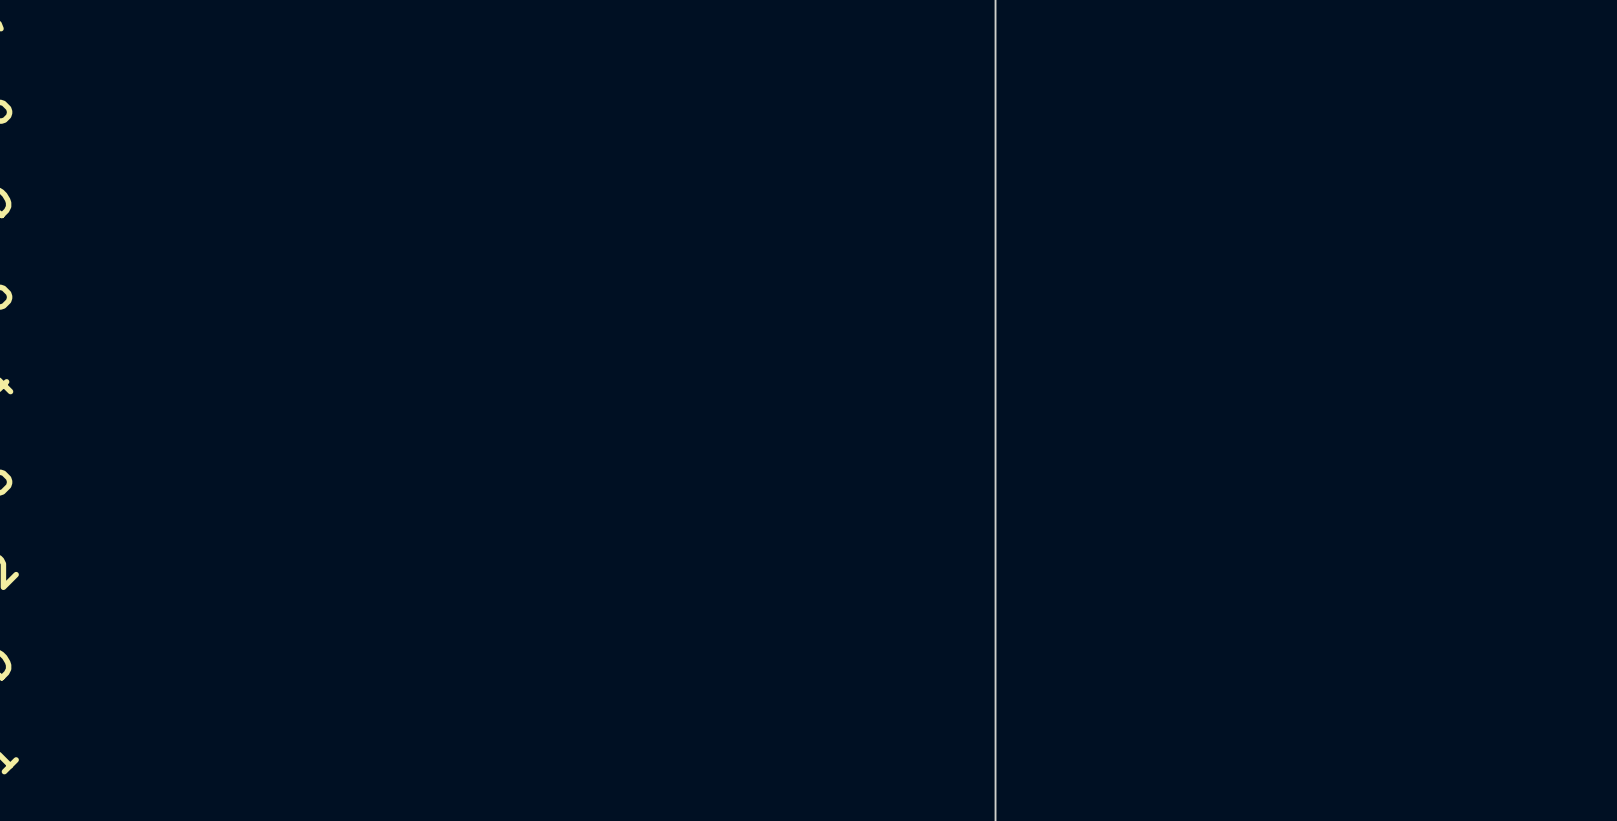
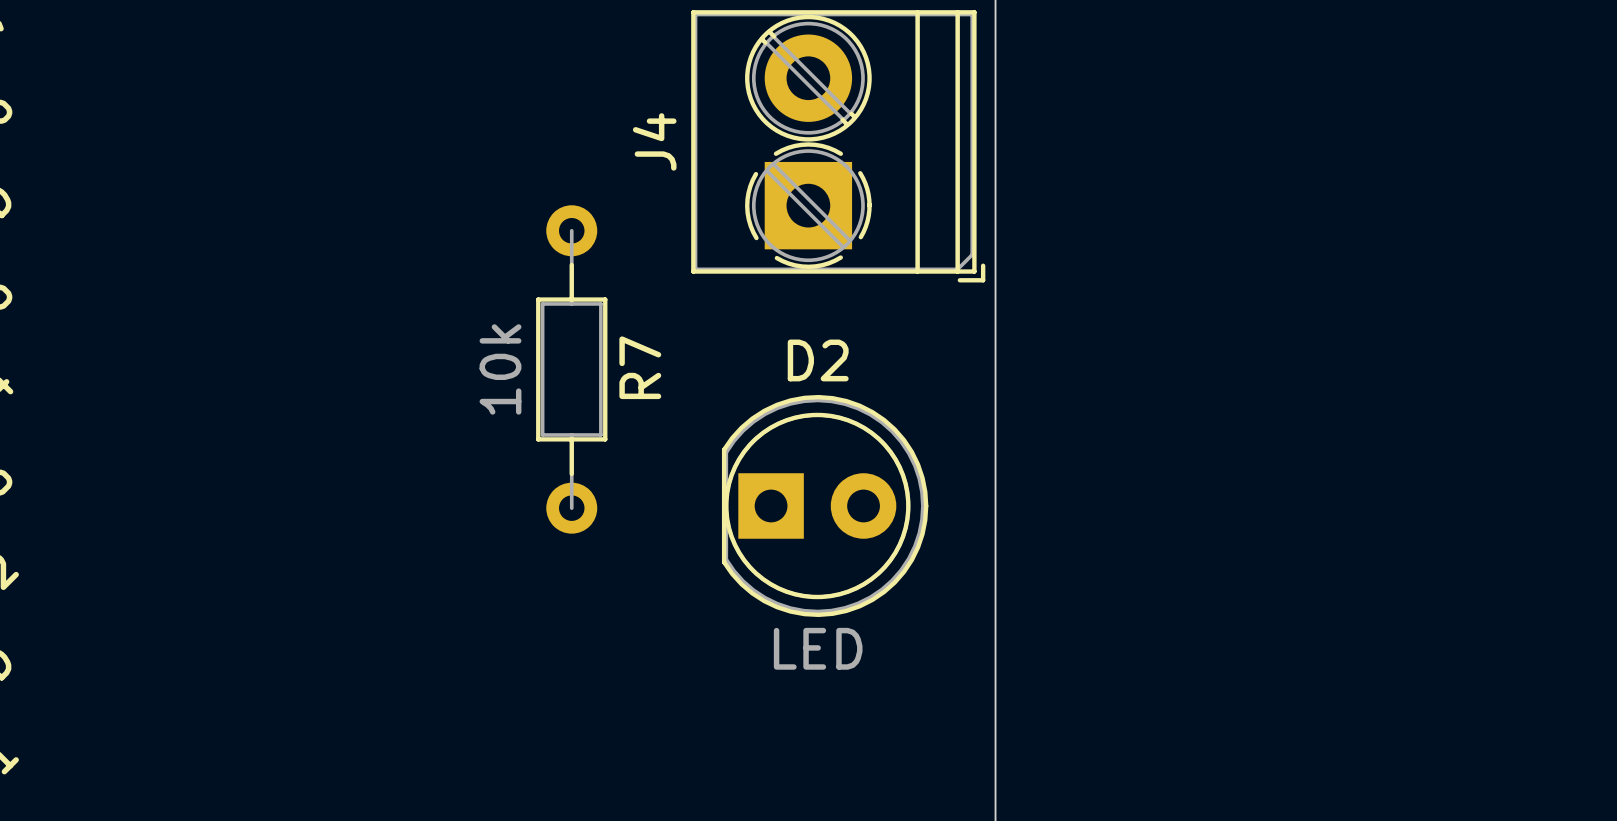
J4: none -> (838, 146)
R7: none -> 10k (571, 369)
D2: none -> LED (825, 505)

